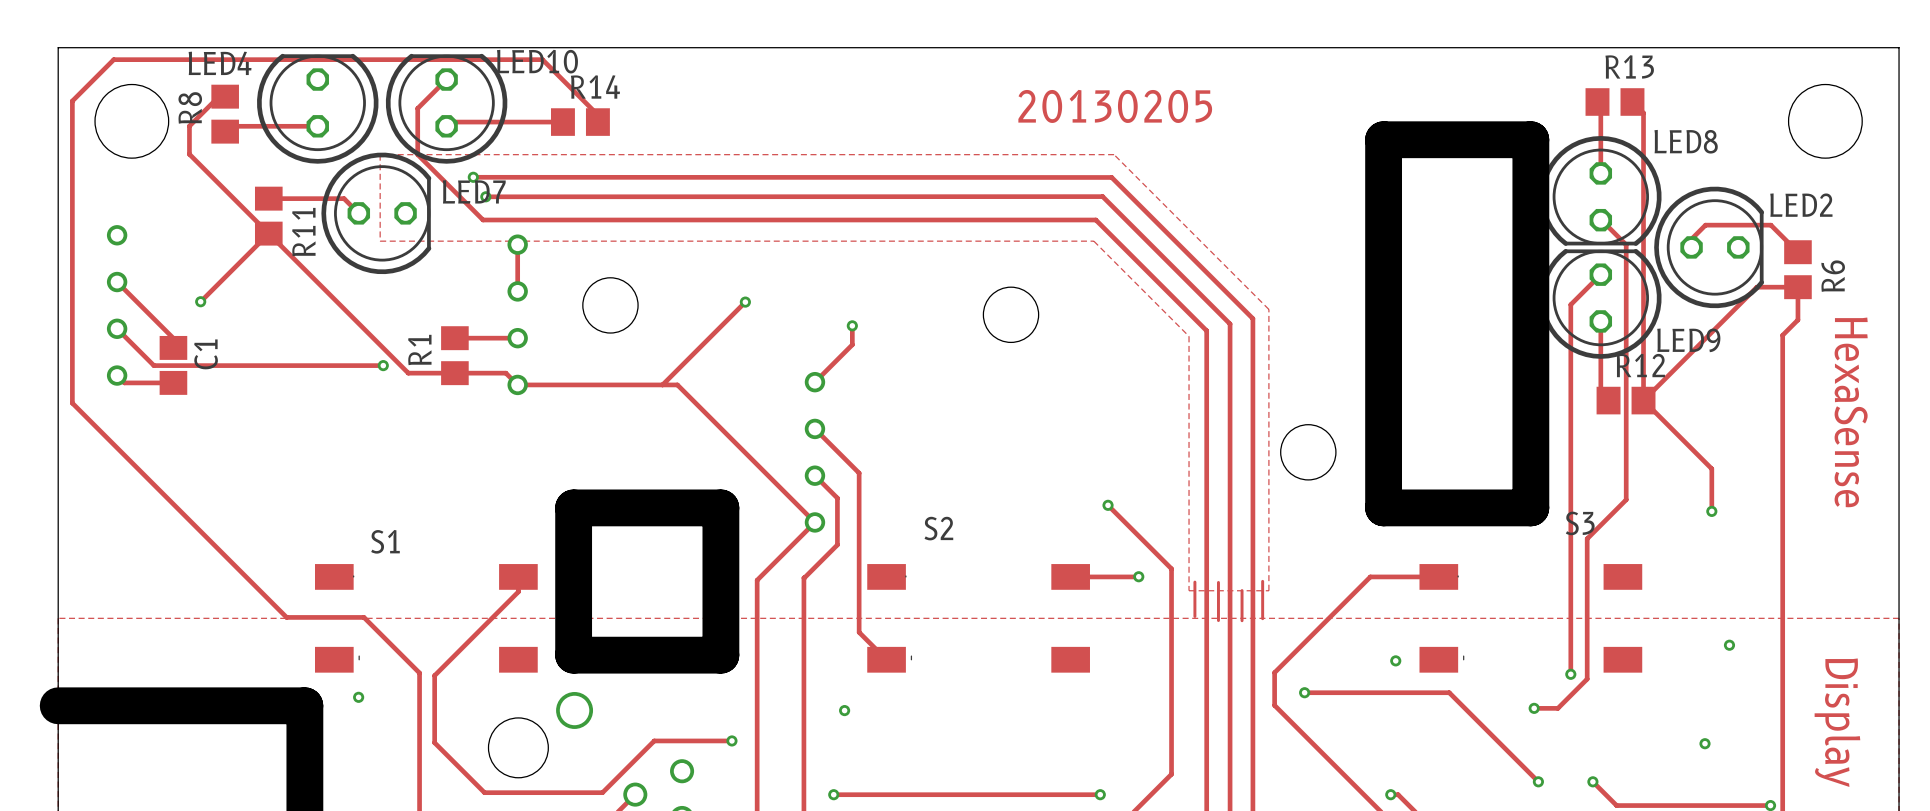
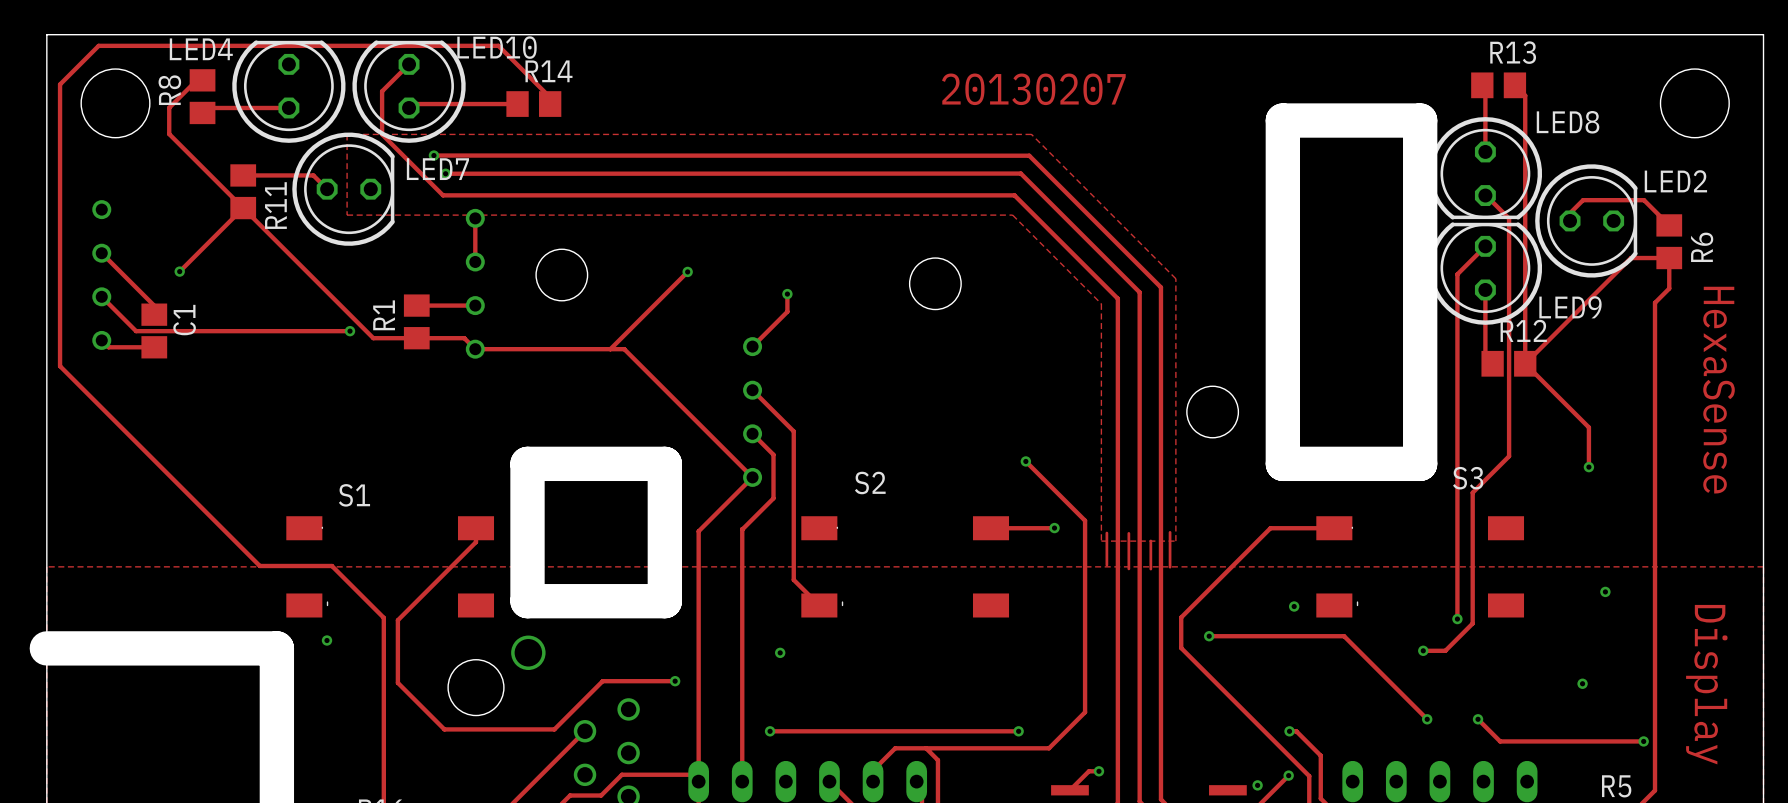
text: 20130205 (1115, 106) -> 20130207 (1033, 89)

